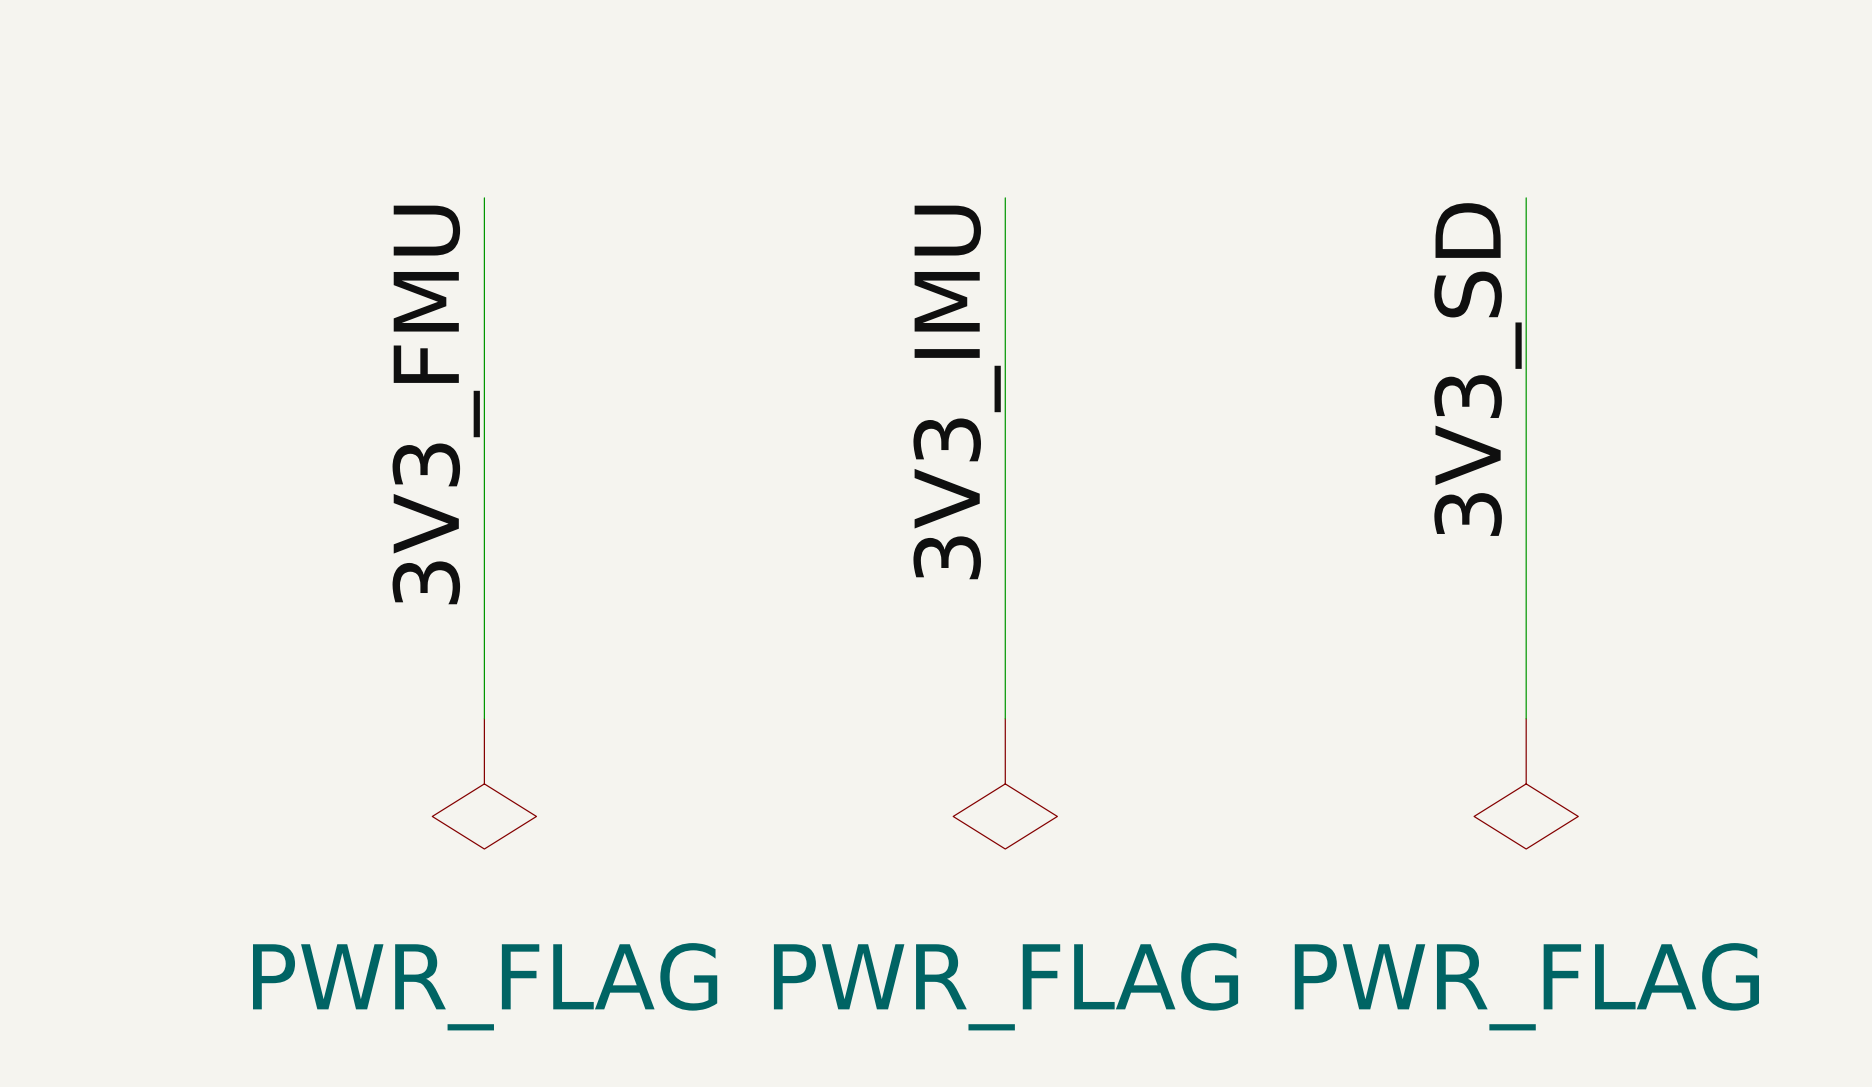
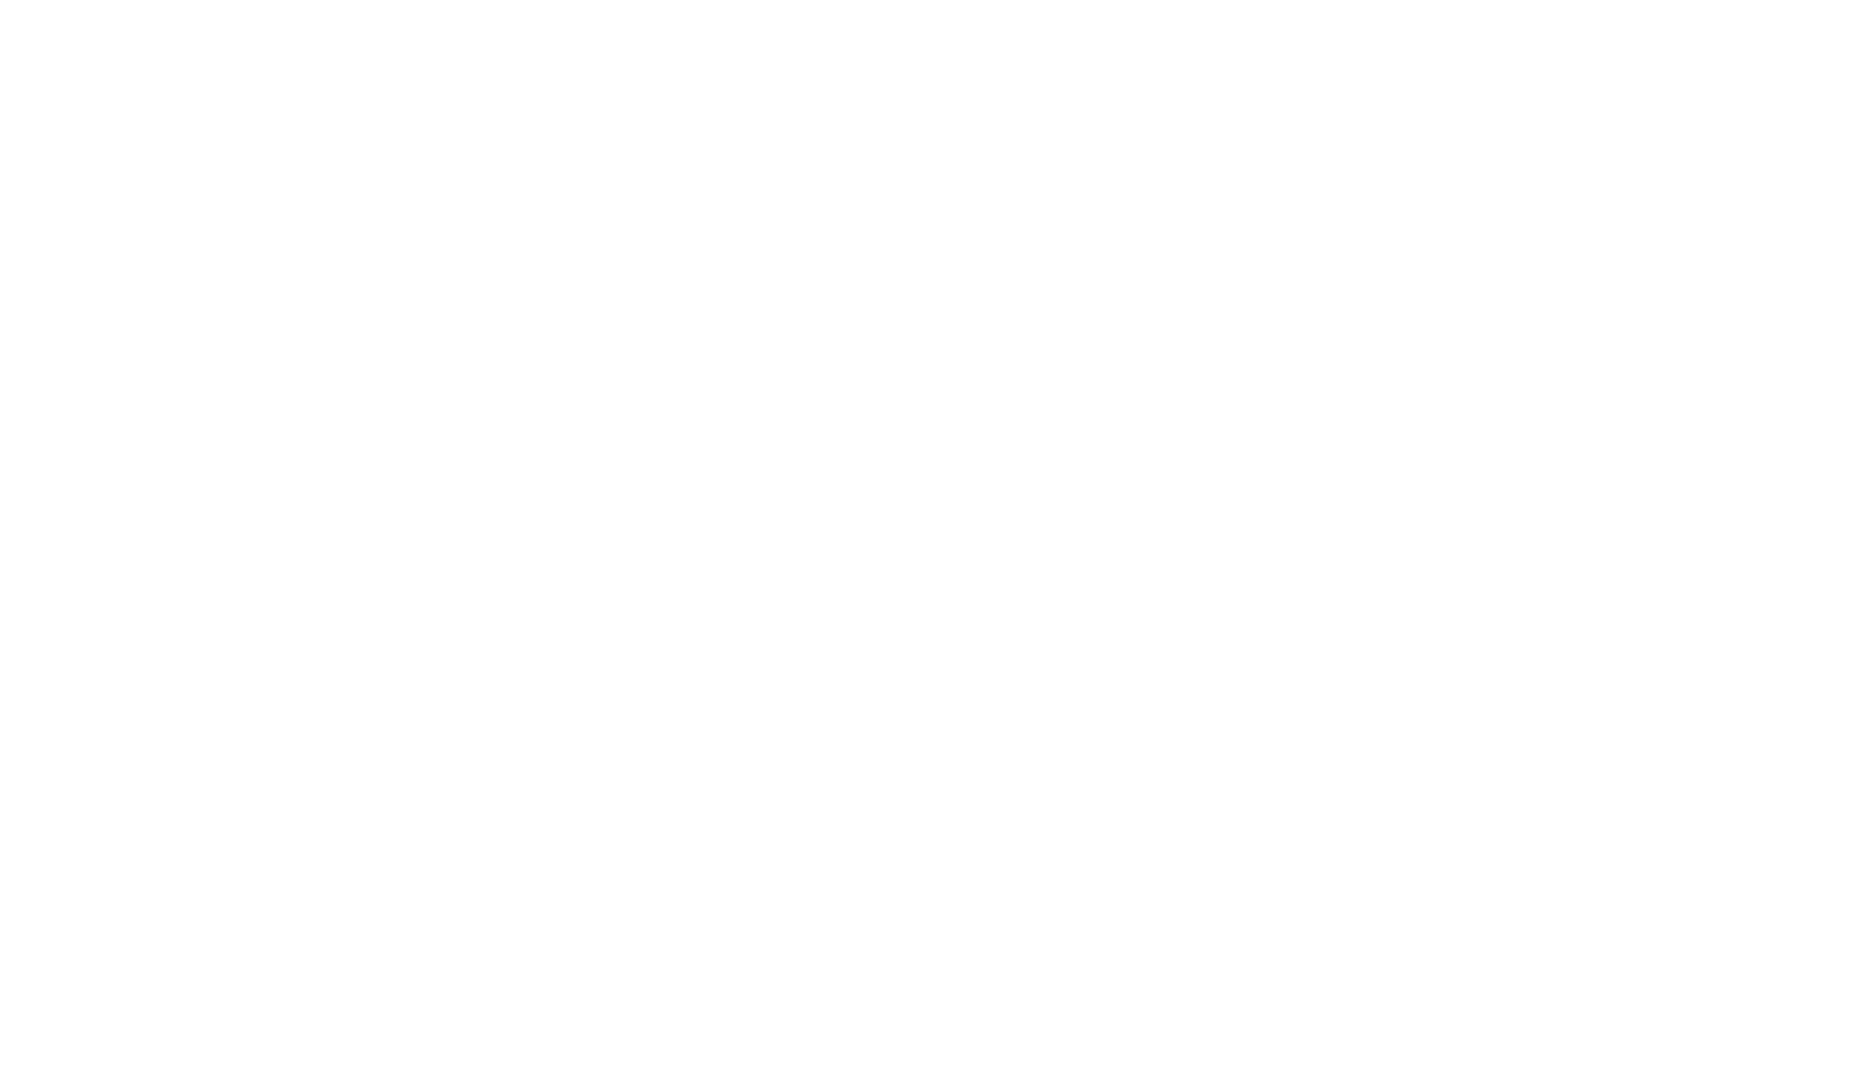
wire: (484, 197) (484, 718) -> none
wire: (1005, 197) (1005, 718) -> none
wire: (1526, 197) (1526, 718) -> none
label: 3V3_SD (1478, 369) -> none
label: 3V3_IMU (957, 392) -> none
label: 3V3_FMU (436, 404) -> none
power symbol: PWR_FLAG (484, 783) -> none
power symbol: PWR_FLAG (1005, 783) -> none
power symbol: PWR_FLAG (1526, 783) -> none

